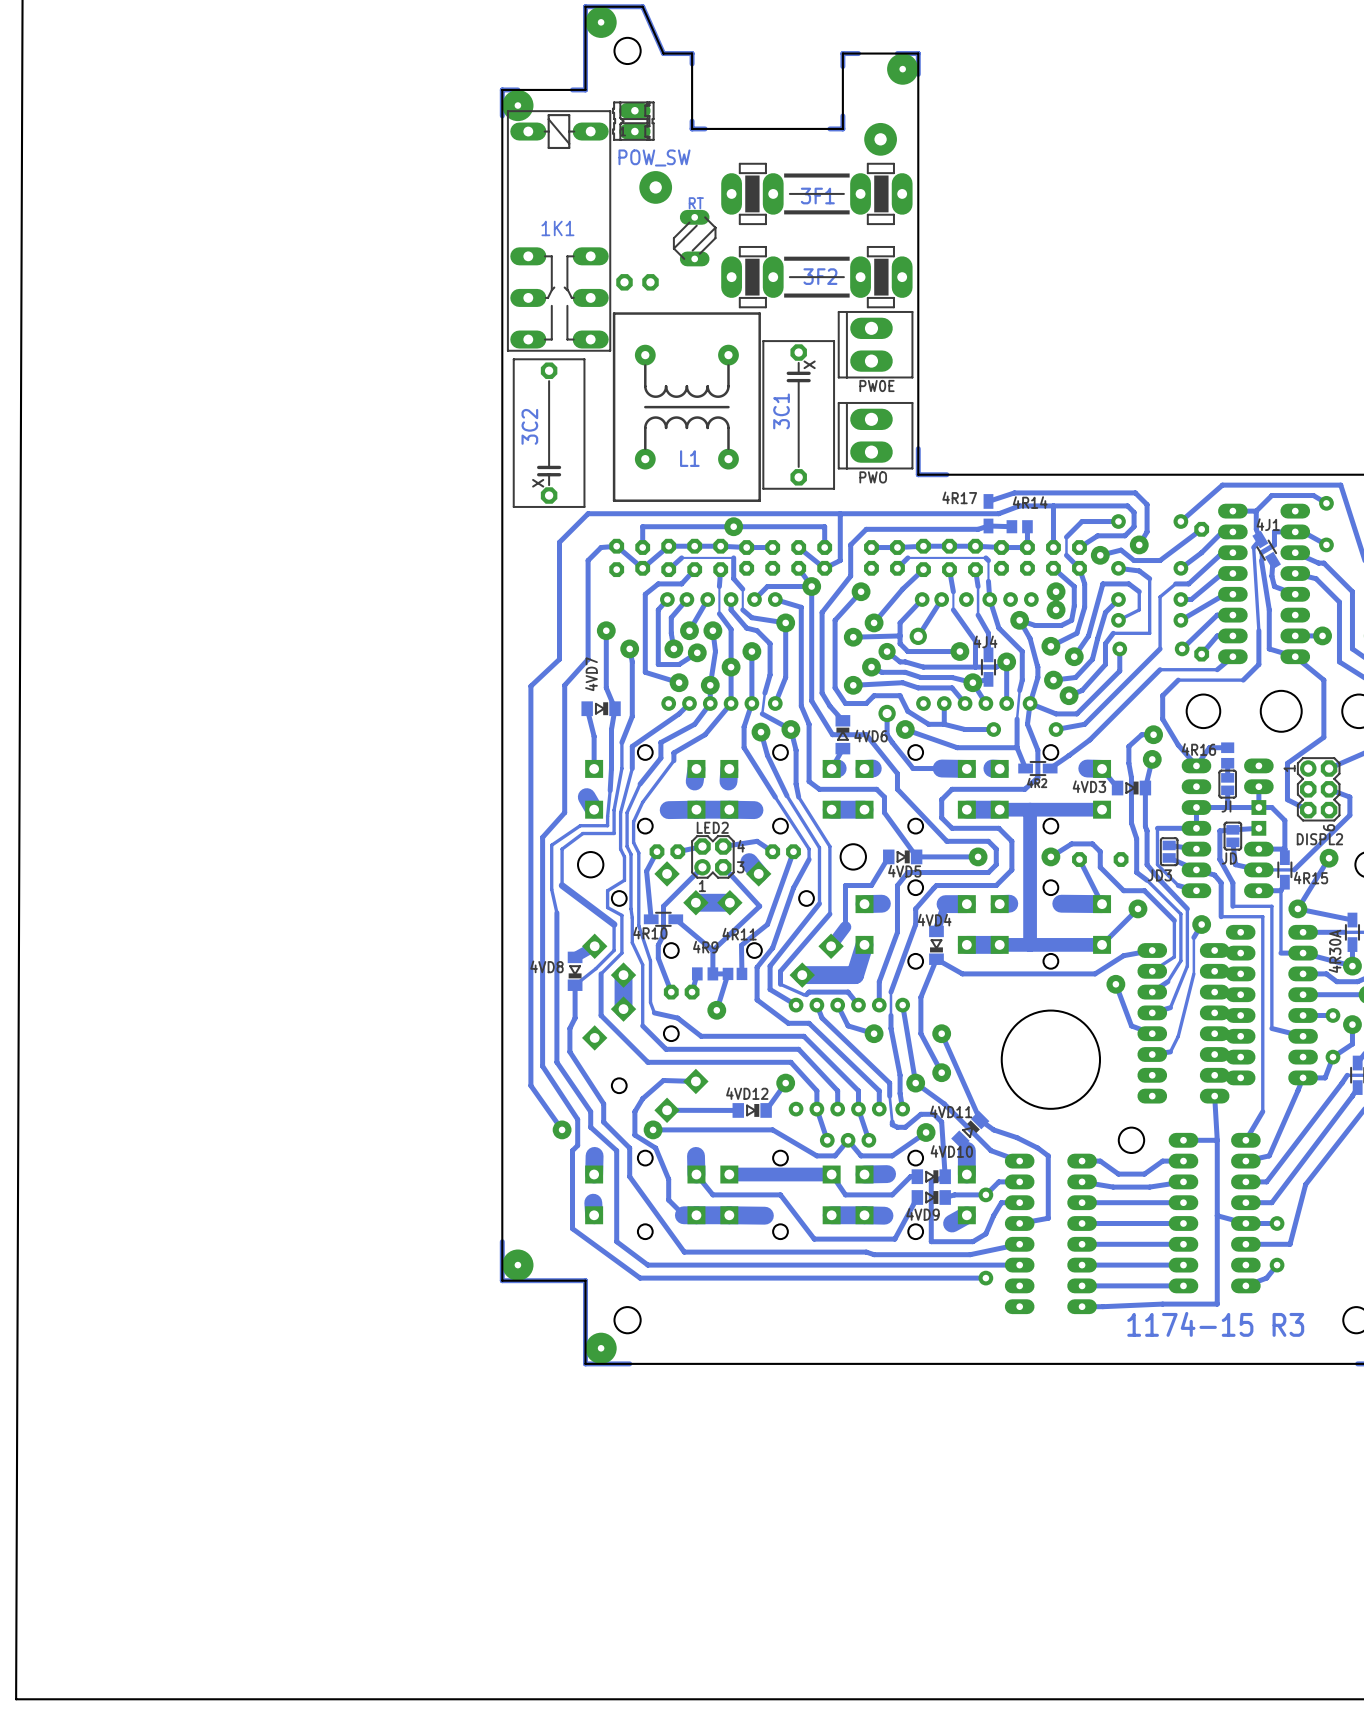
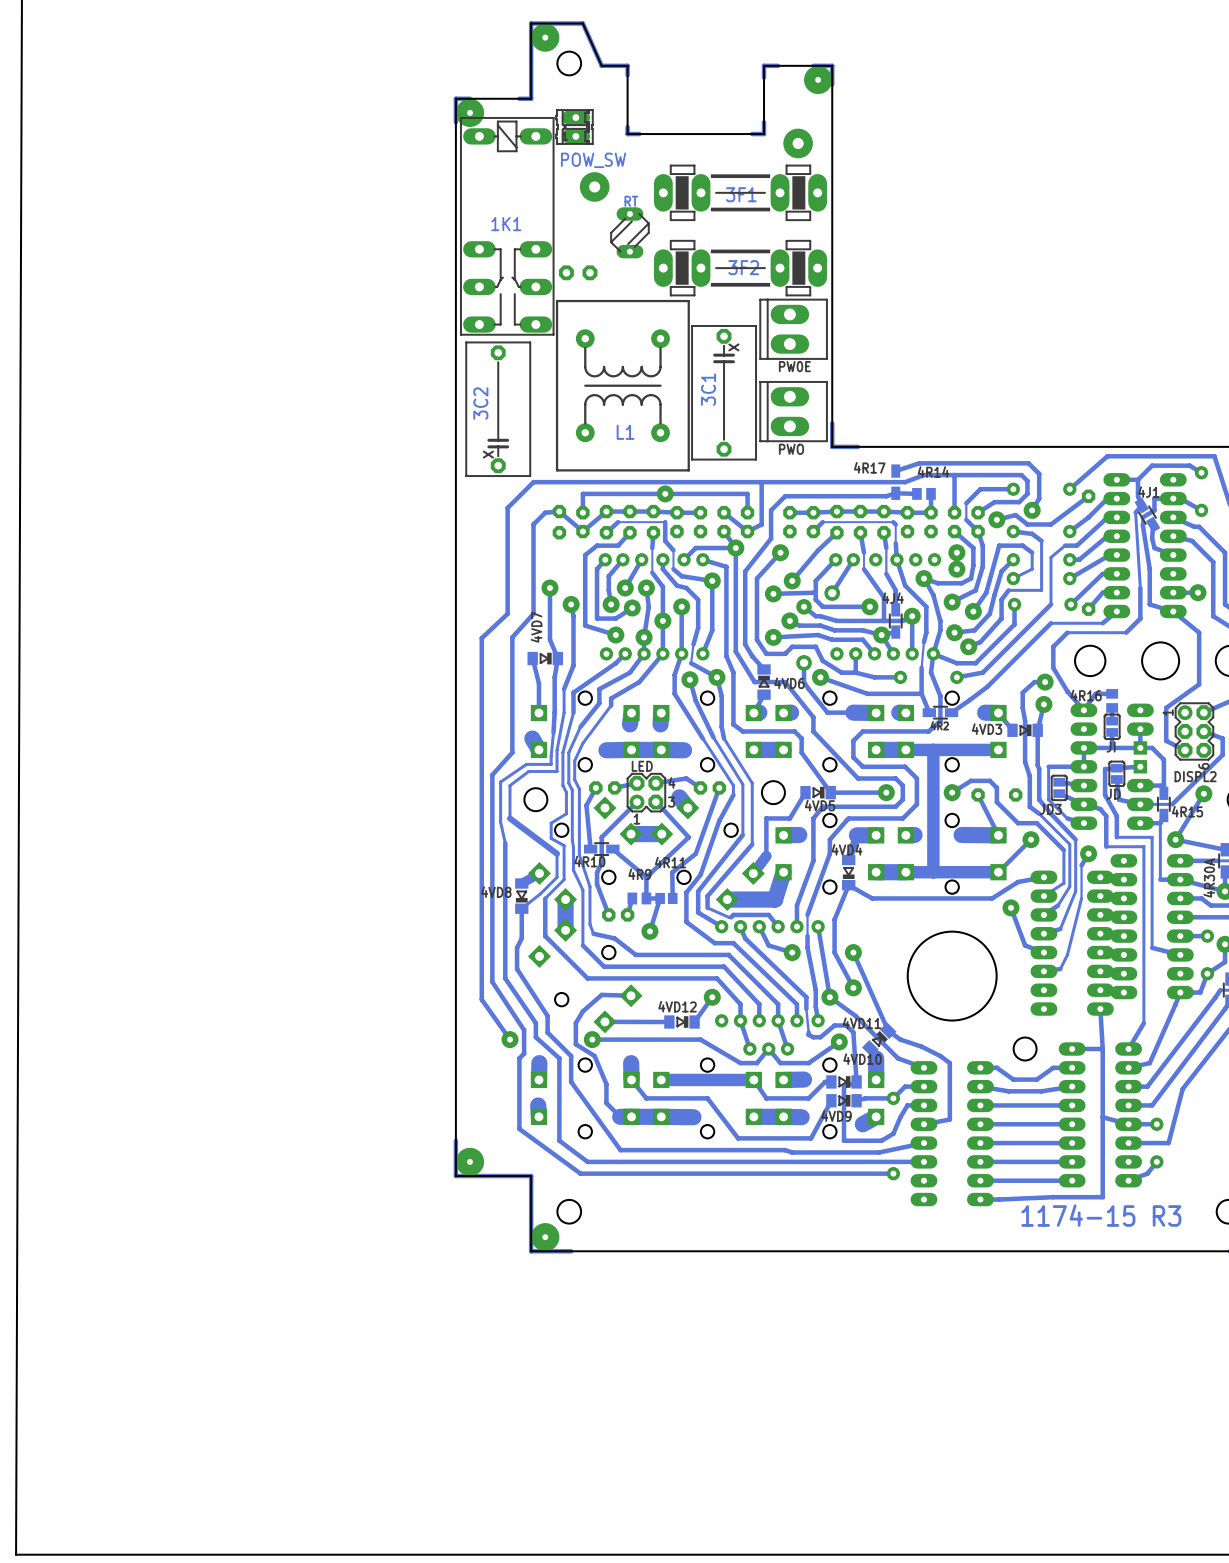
LED2 name: LED2 (712, 827) -> LED (642, 766)

